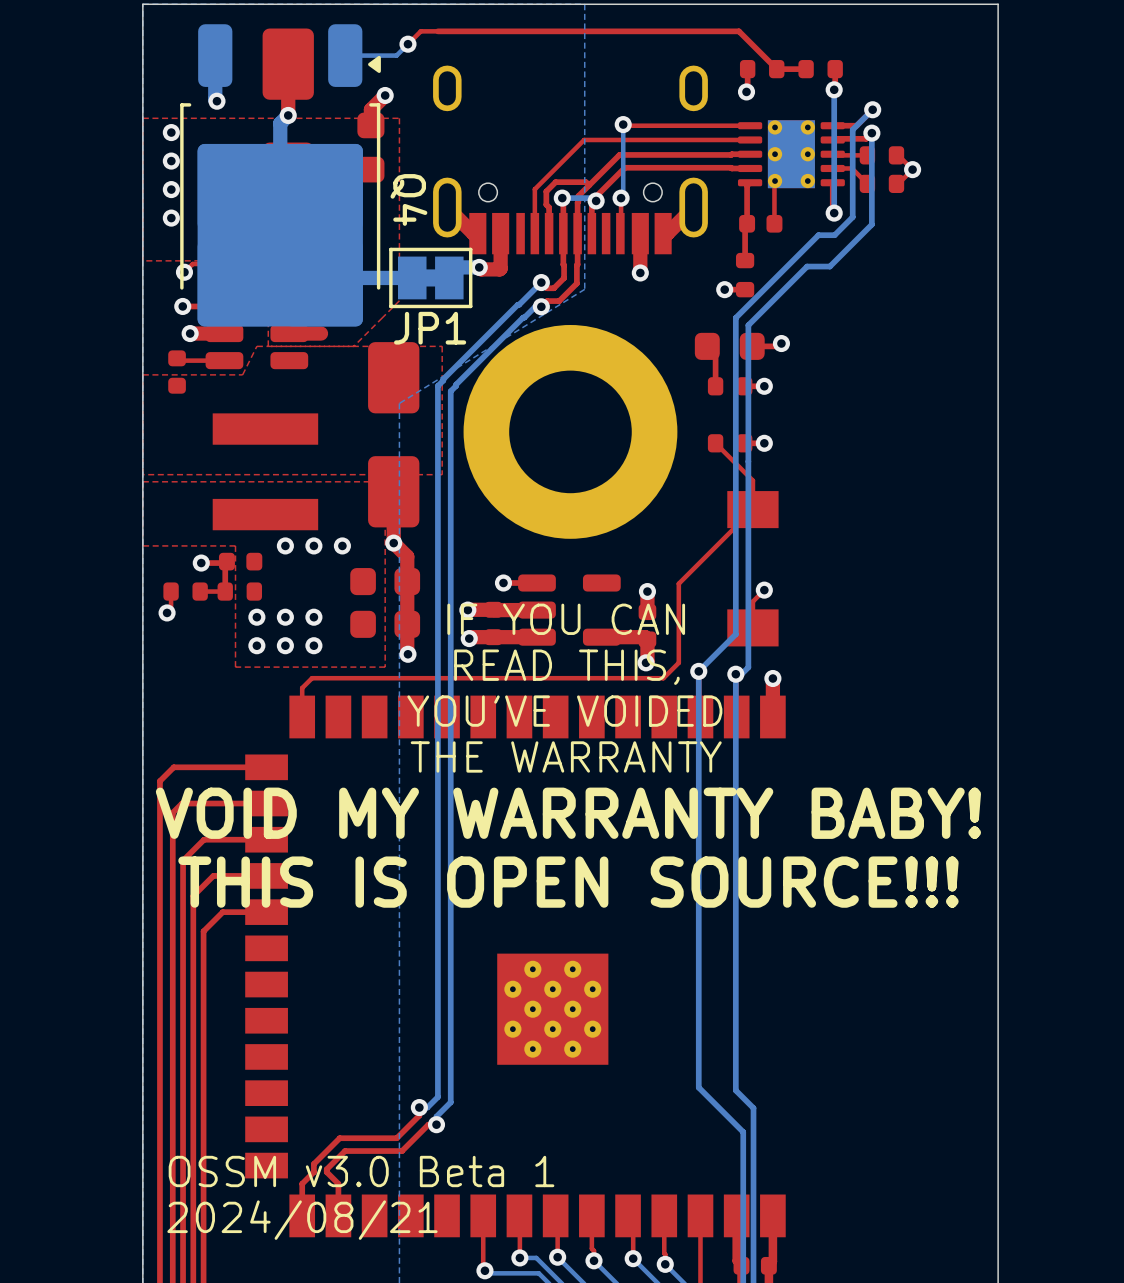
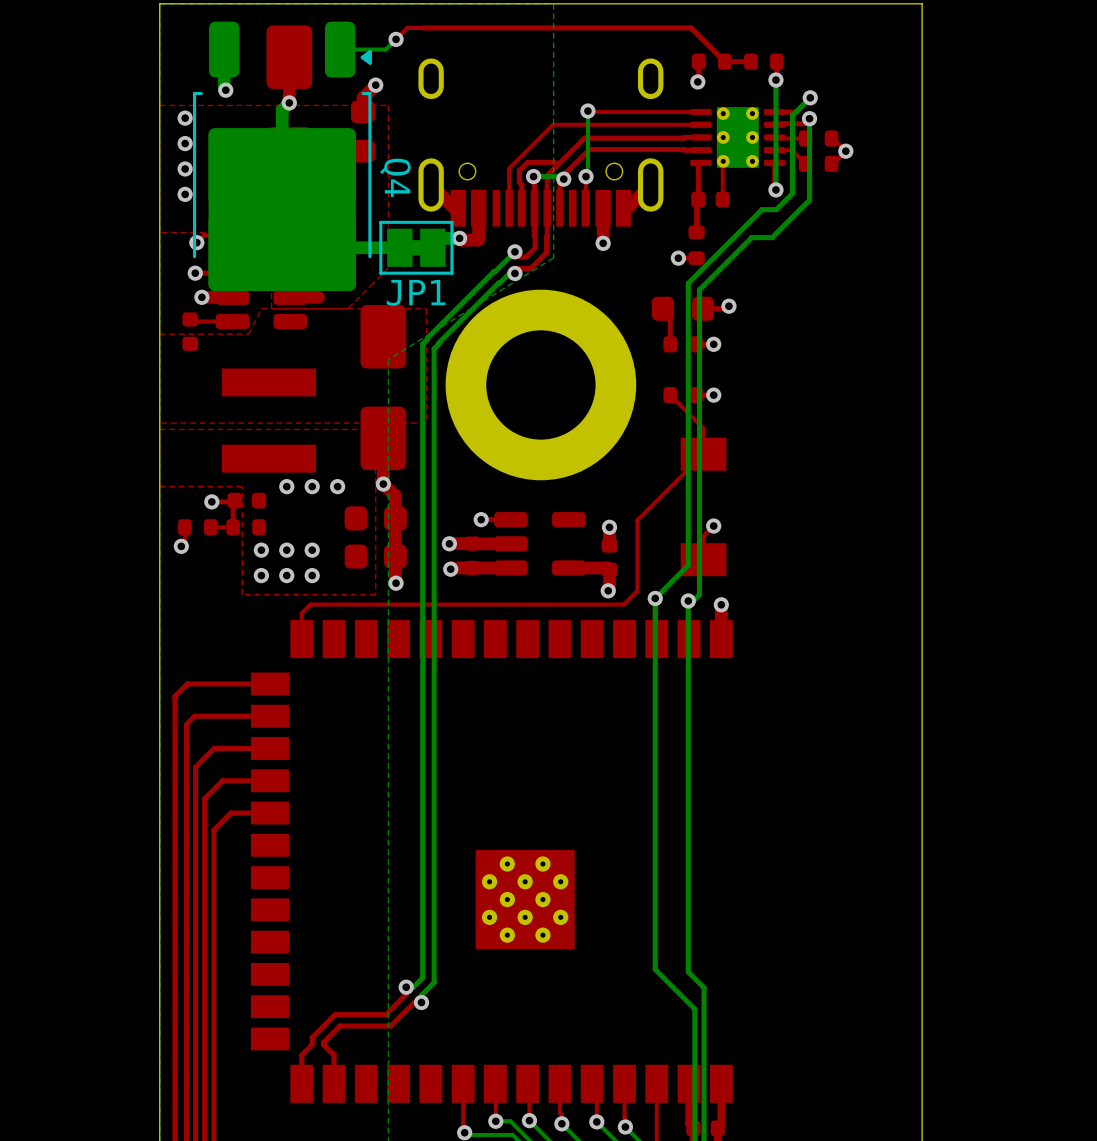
text: IF YOU CAN (566, 619) -> none
text: READ THIS, (566, 667) -> none
text: YOU'VE VOIDED (564, 711) -> none
text: THE WARRANTY (566, 756) -> none
text: VOID MY WARRANTY BABY! (568, 813) -> none
text: THIS IS OPEN SOURCE!!! (568, 882) -> none
text: OSSM v3.0 Beta 1 (361, 1171) -> none
text: 2024/08/21 (302, 1220) -> none

